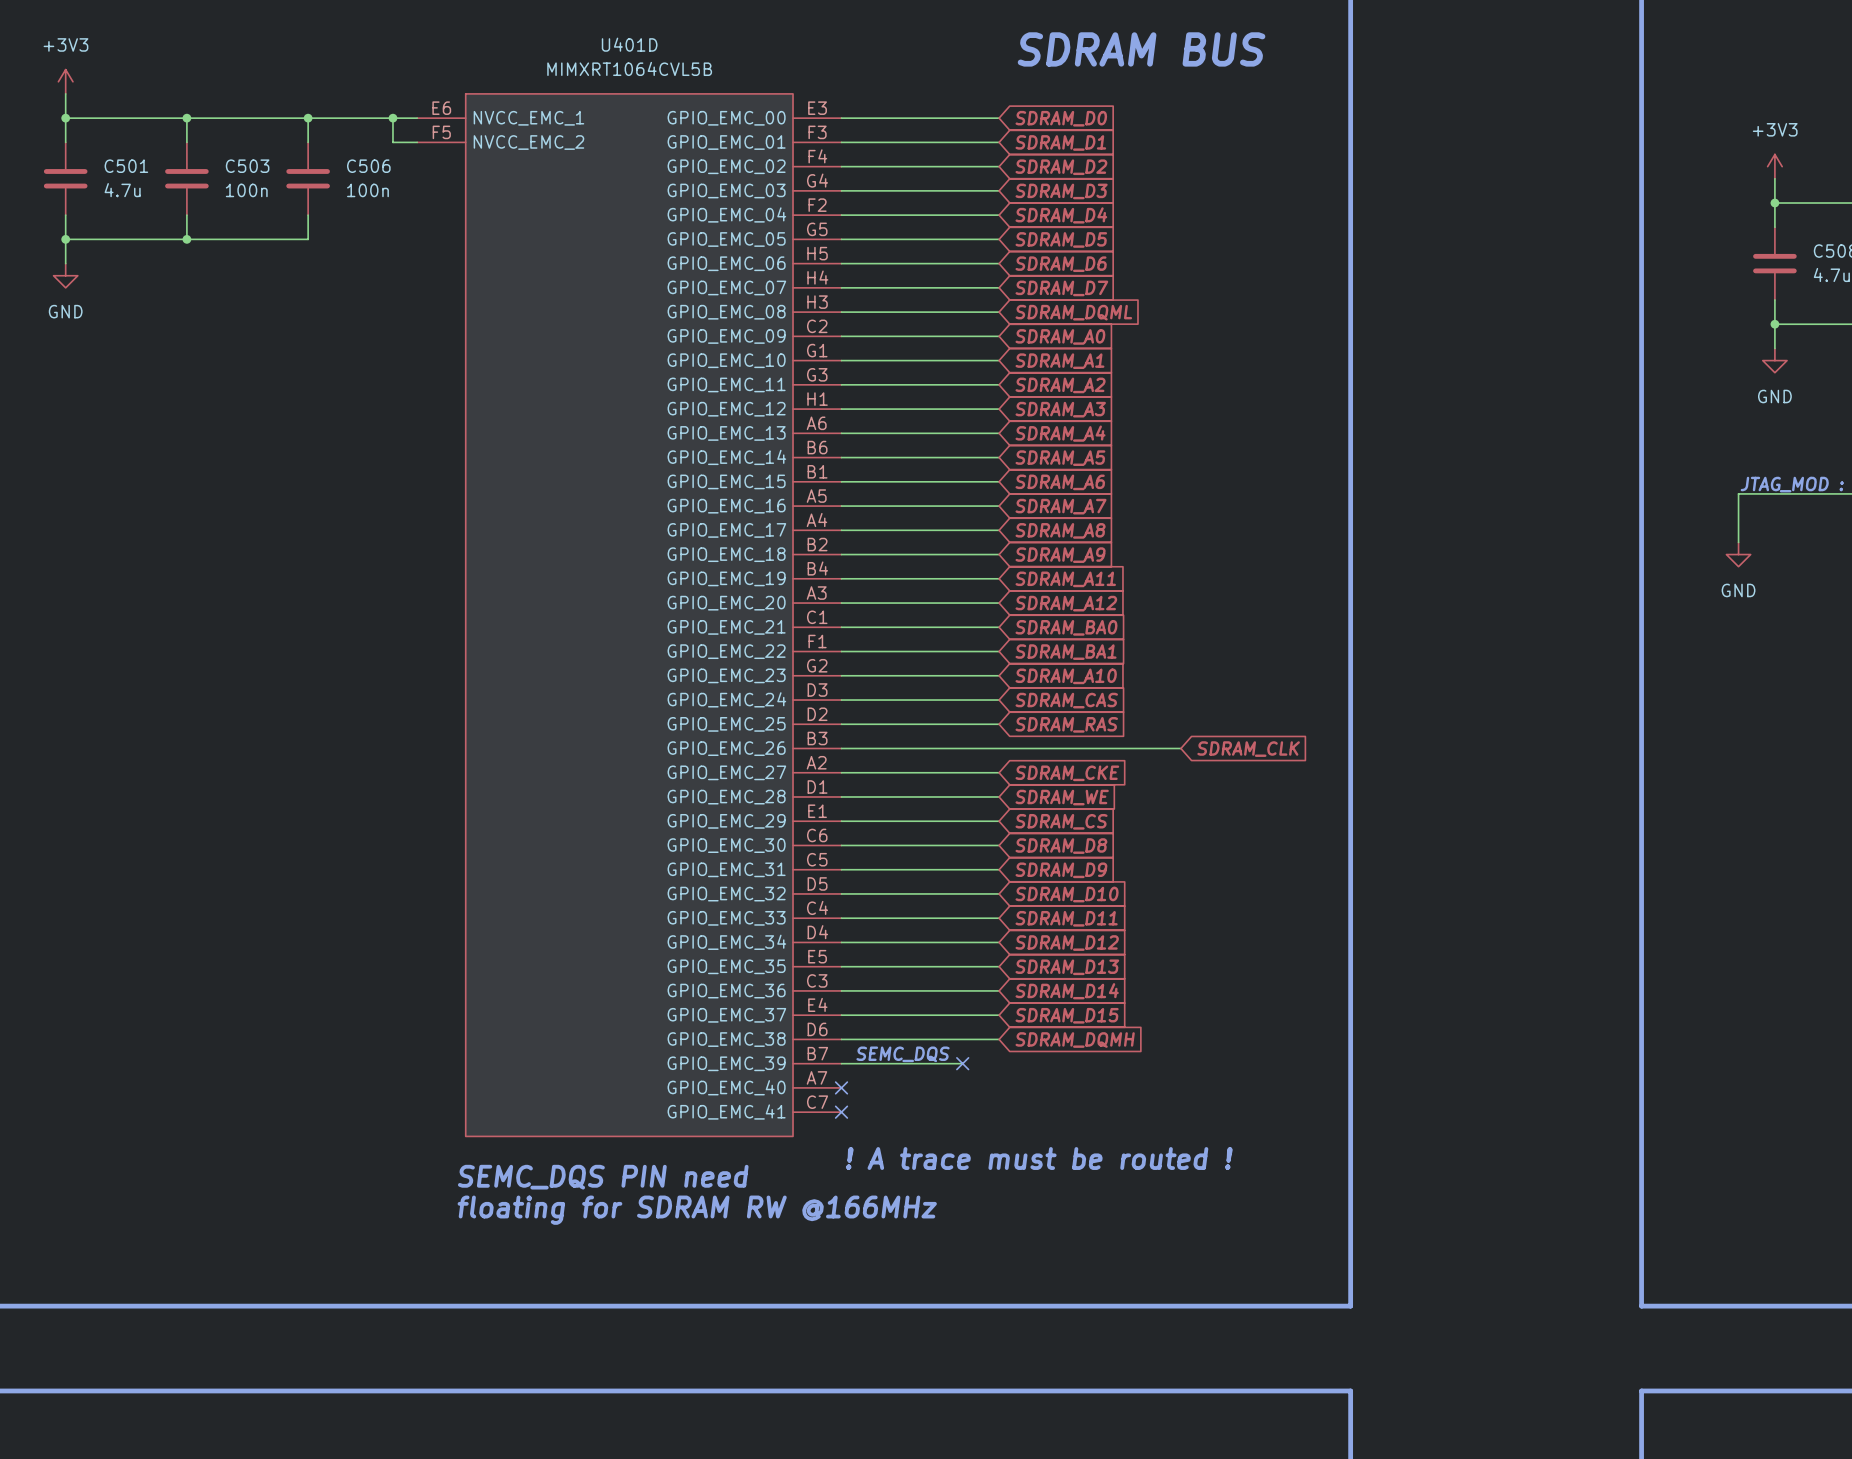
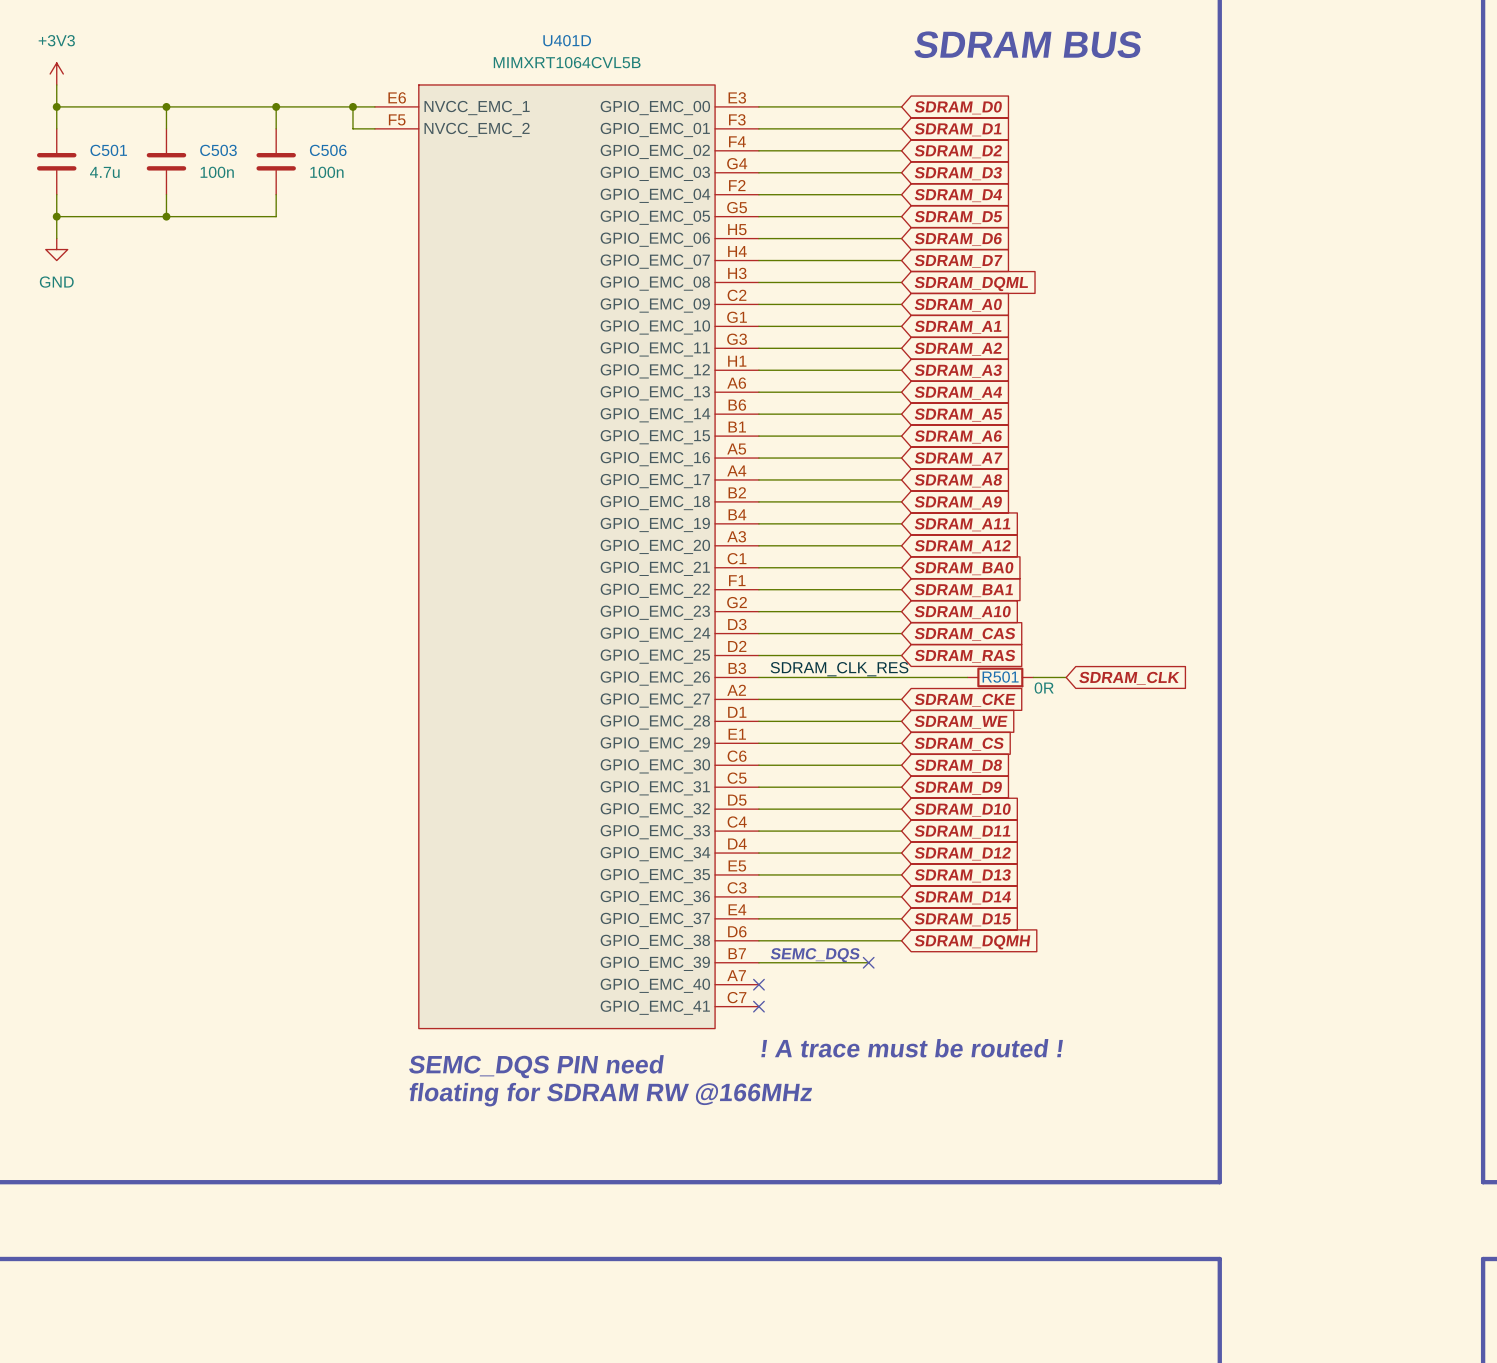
label: none -> SDRAM_CLK_RES (839, 669)
R501: none -> 0R (1000, 677)

